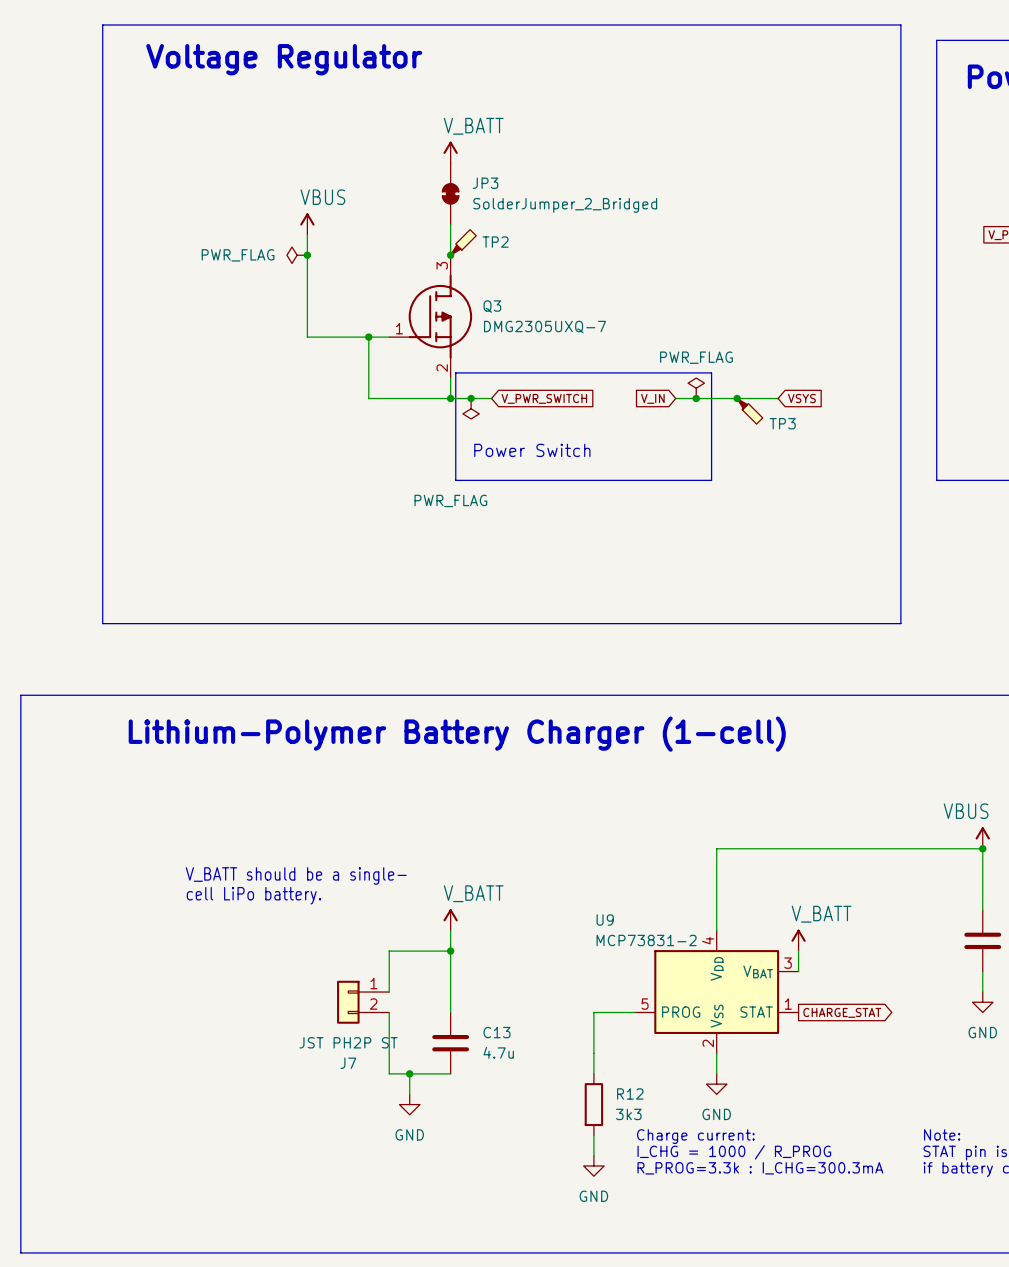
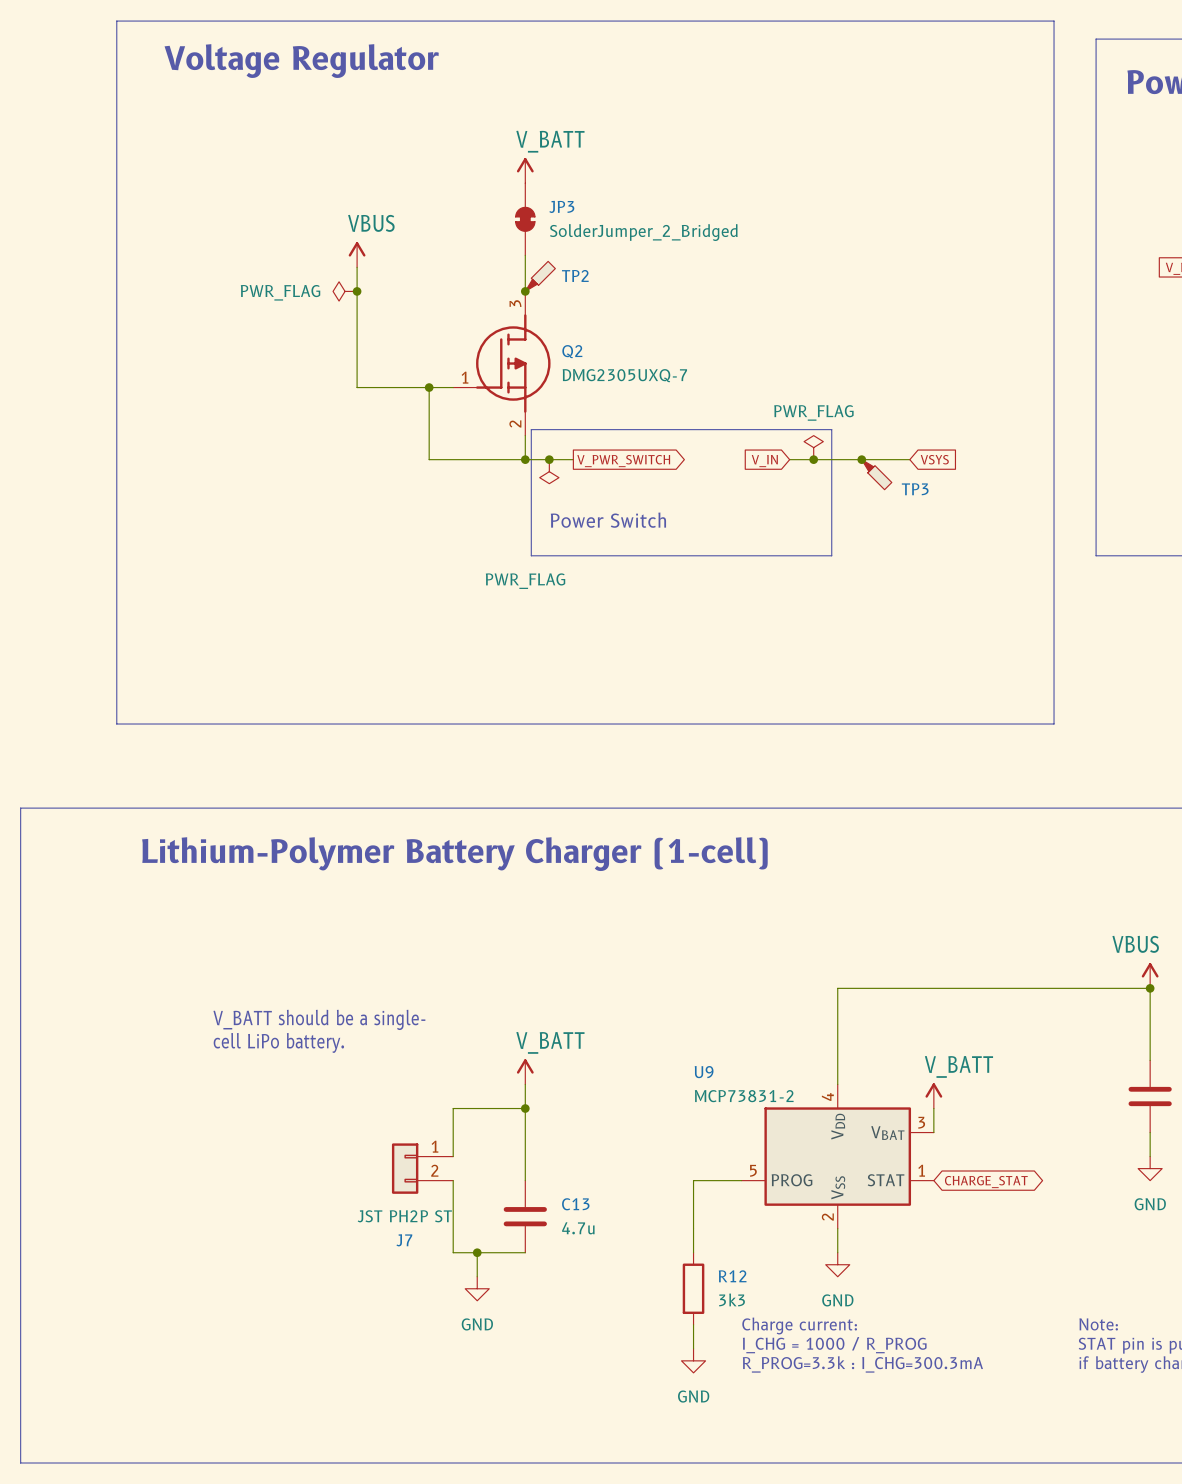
Q3 name: Q3 (492, 306) -> Q2 (572, 351)
global label shape: input (544, 398) -> output (623, 461)
global label shape: output (842, 1012) -> bidirectional (986, 1182)

